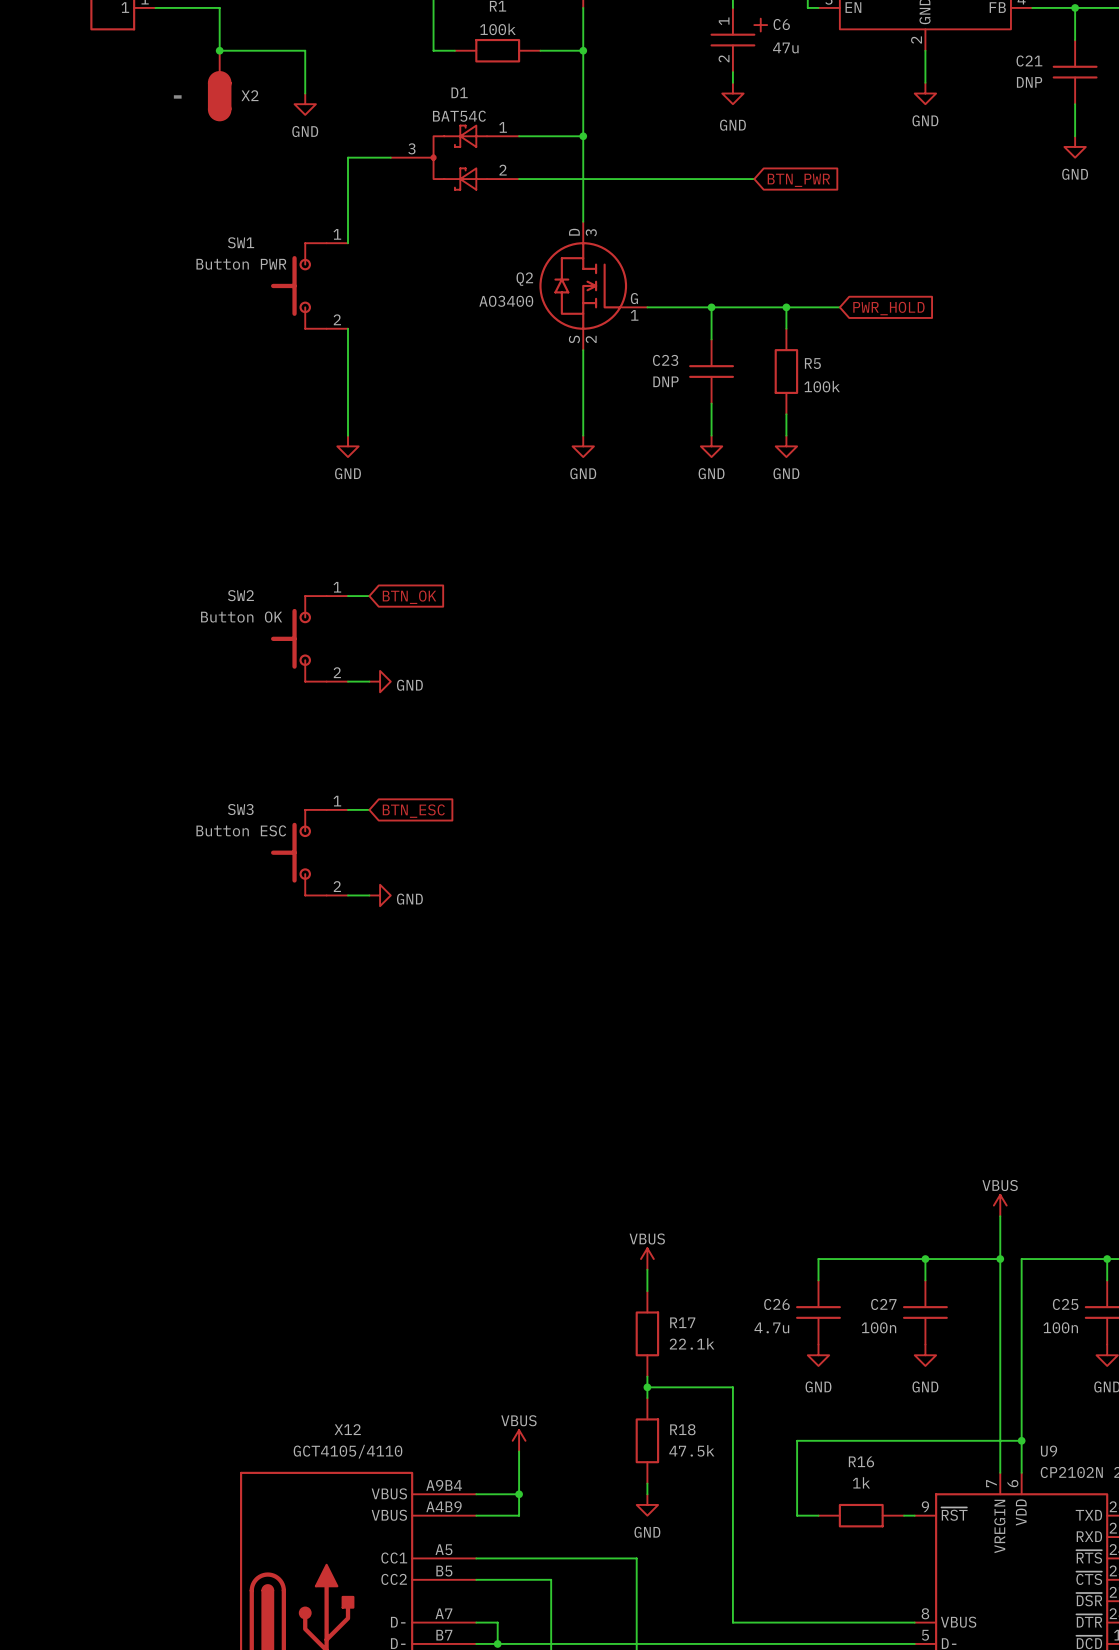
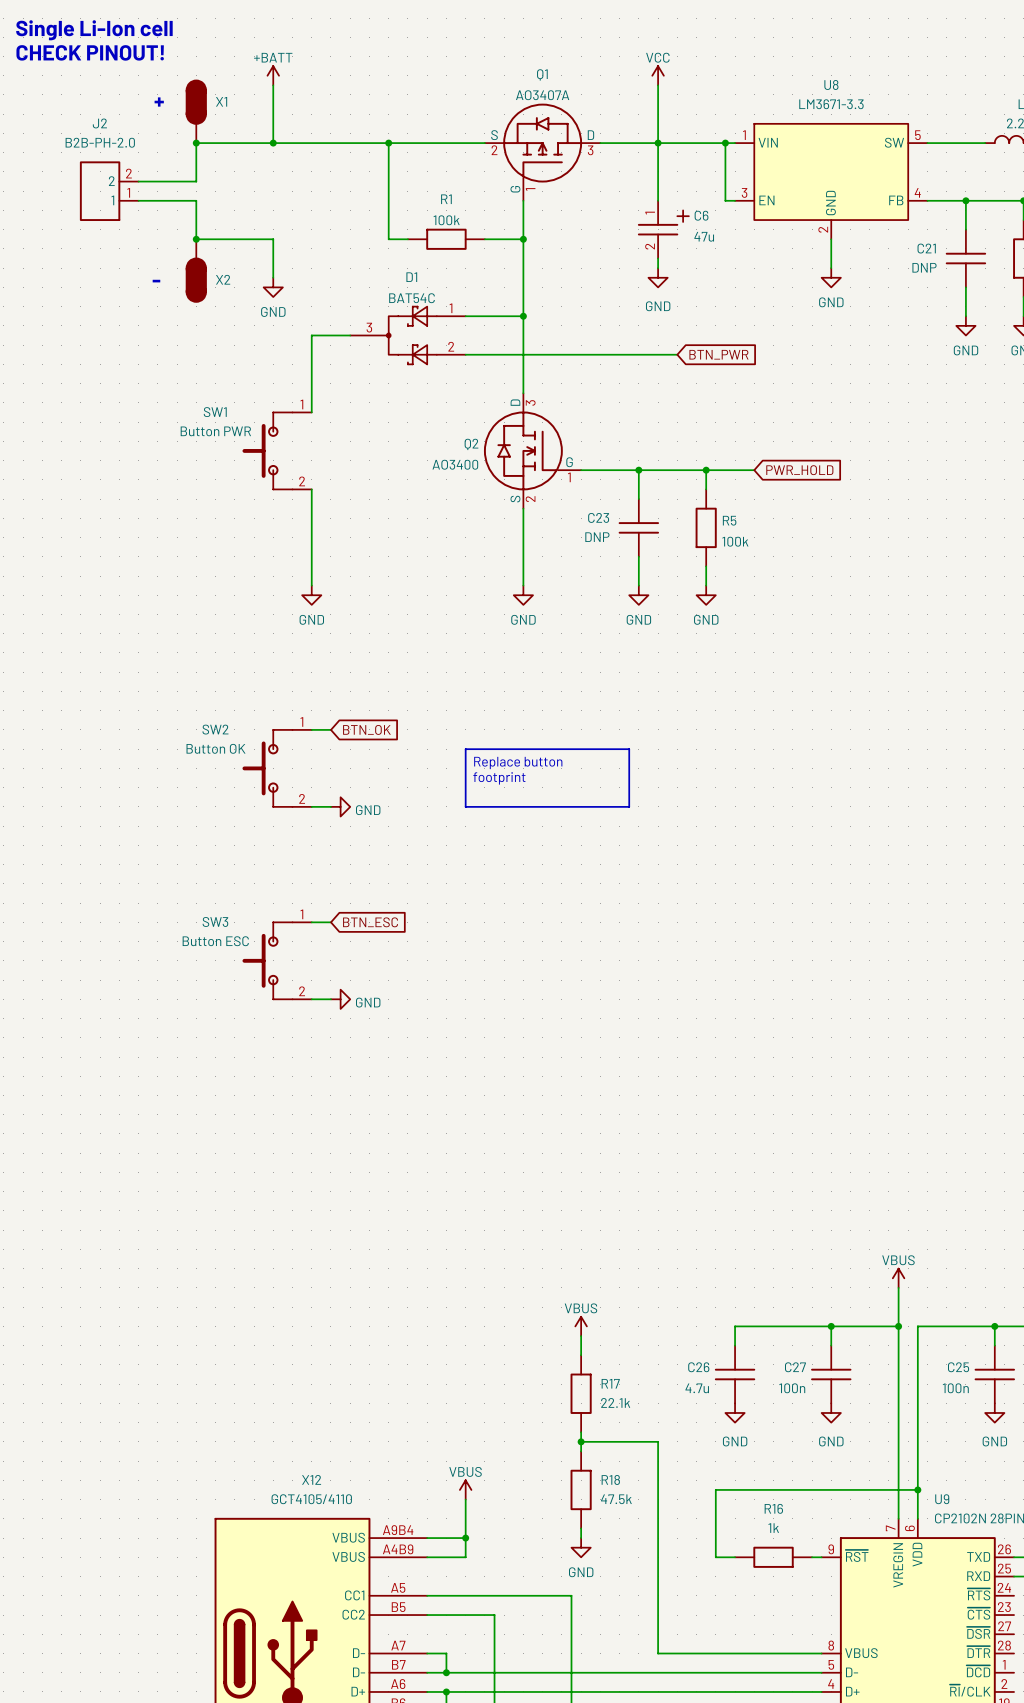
line: none -> (465, 749) (629, 749) (629, 806) (465, 806) (465, 749)
text: none -> Replace button (518, 762)
text: none -> footprint (499, 778)

